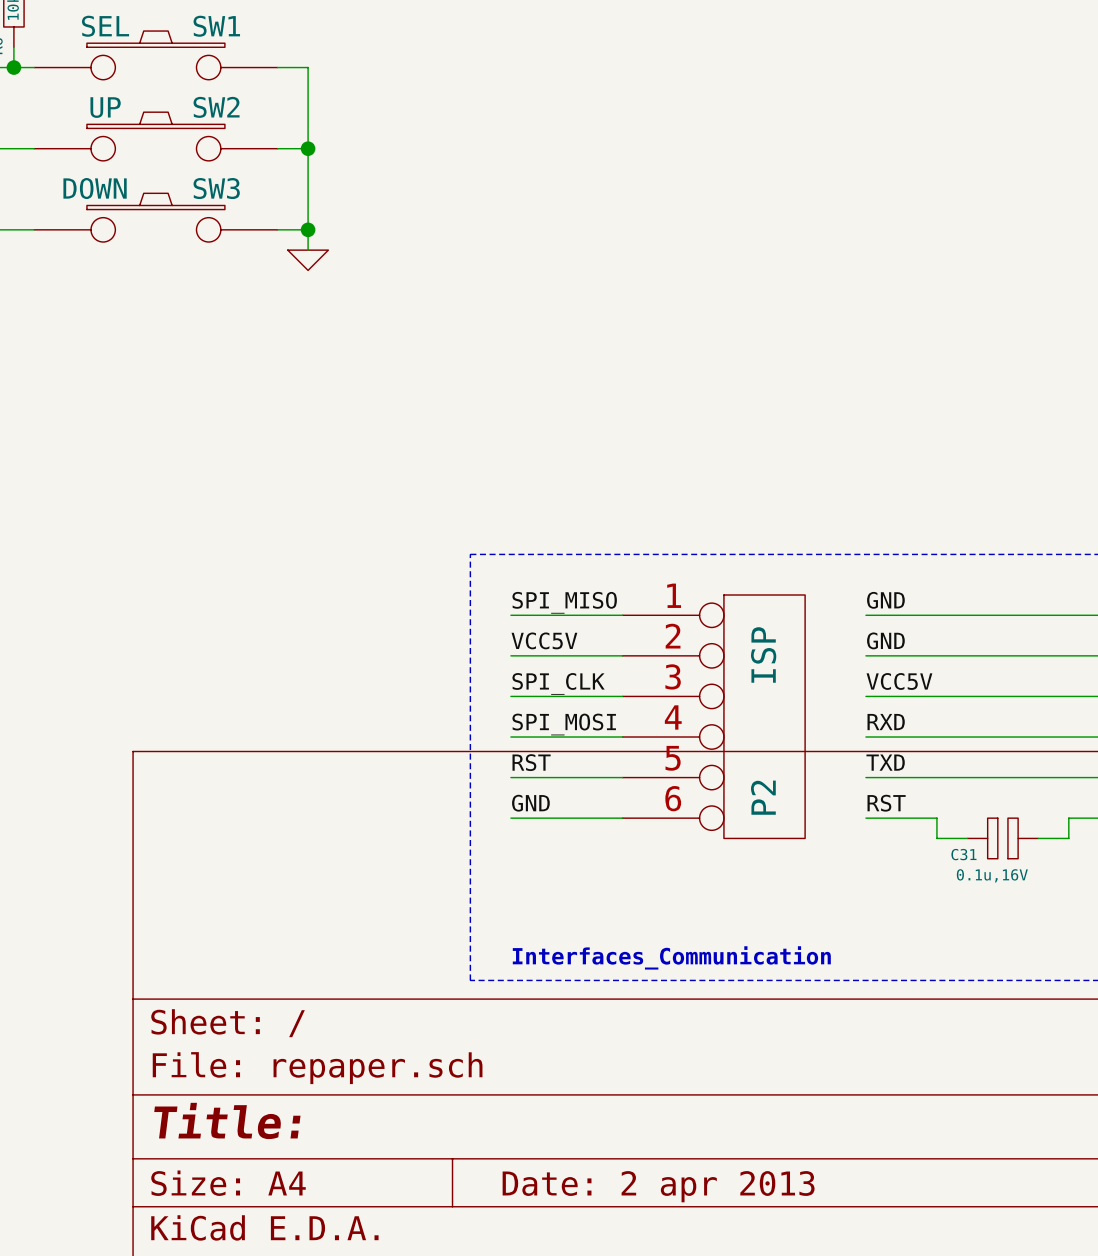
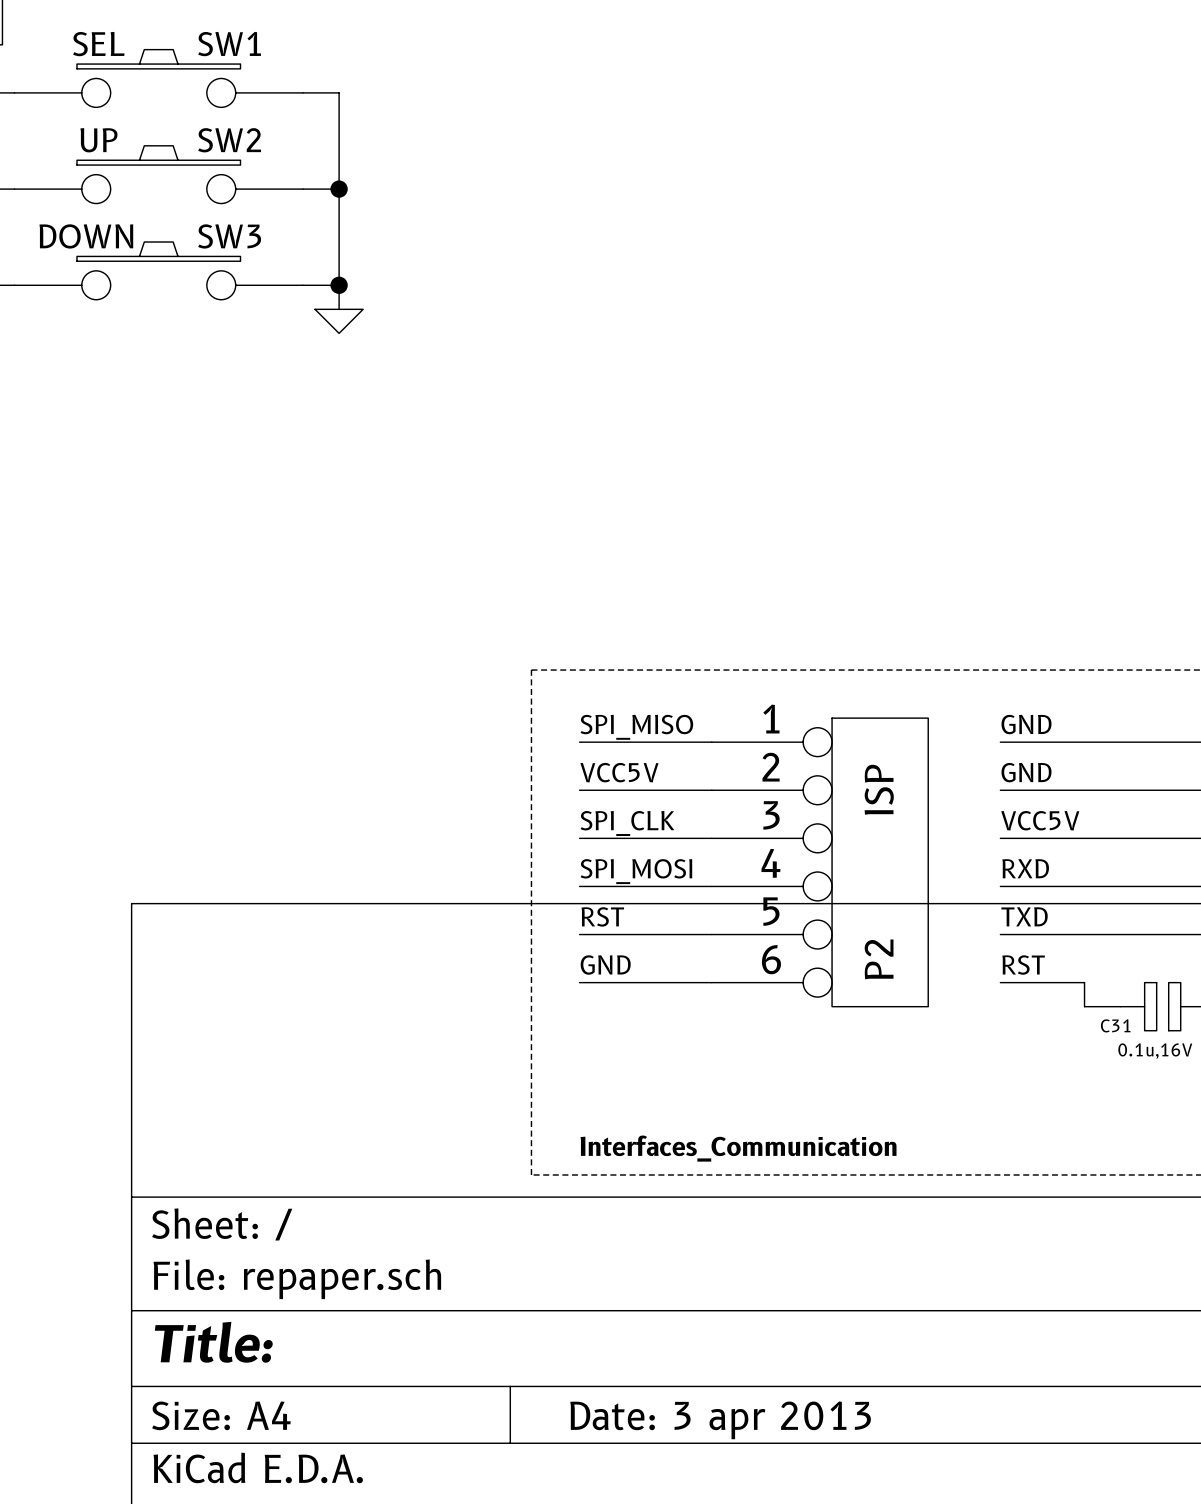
title block: Date: 2 apr 2013 (658, 1186) -> Date: 3 apr 2013 (720, 1420)

